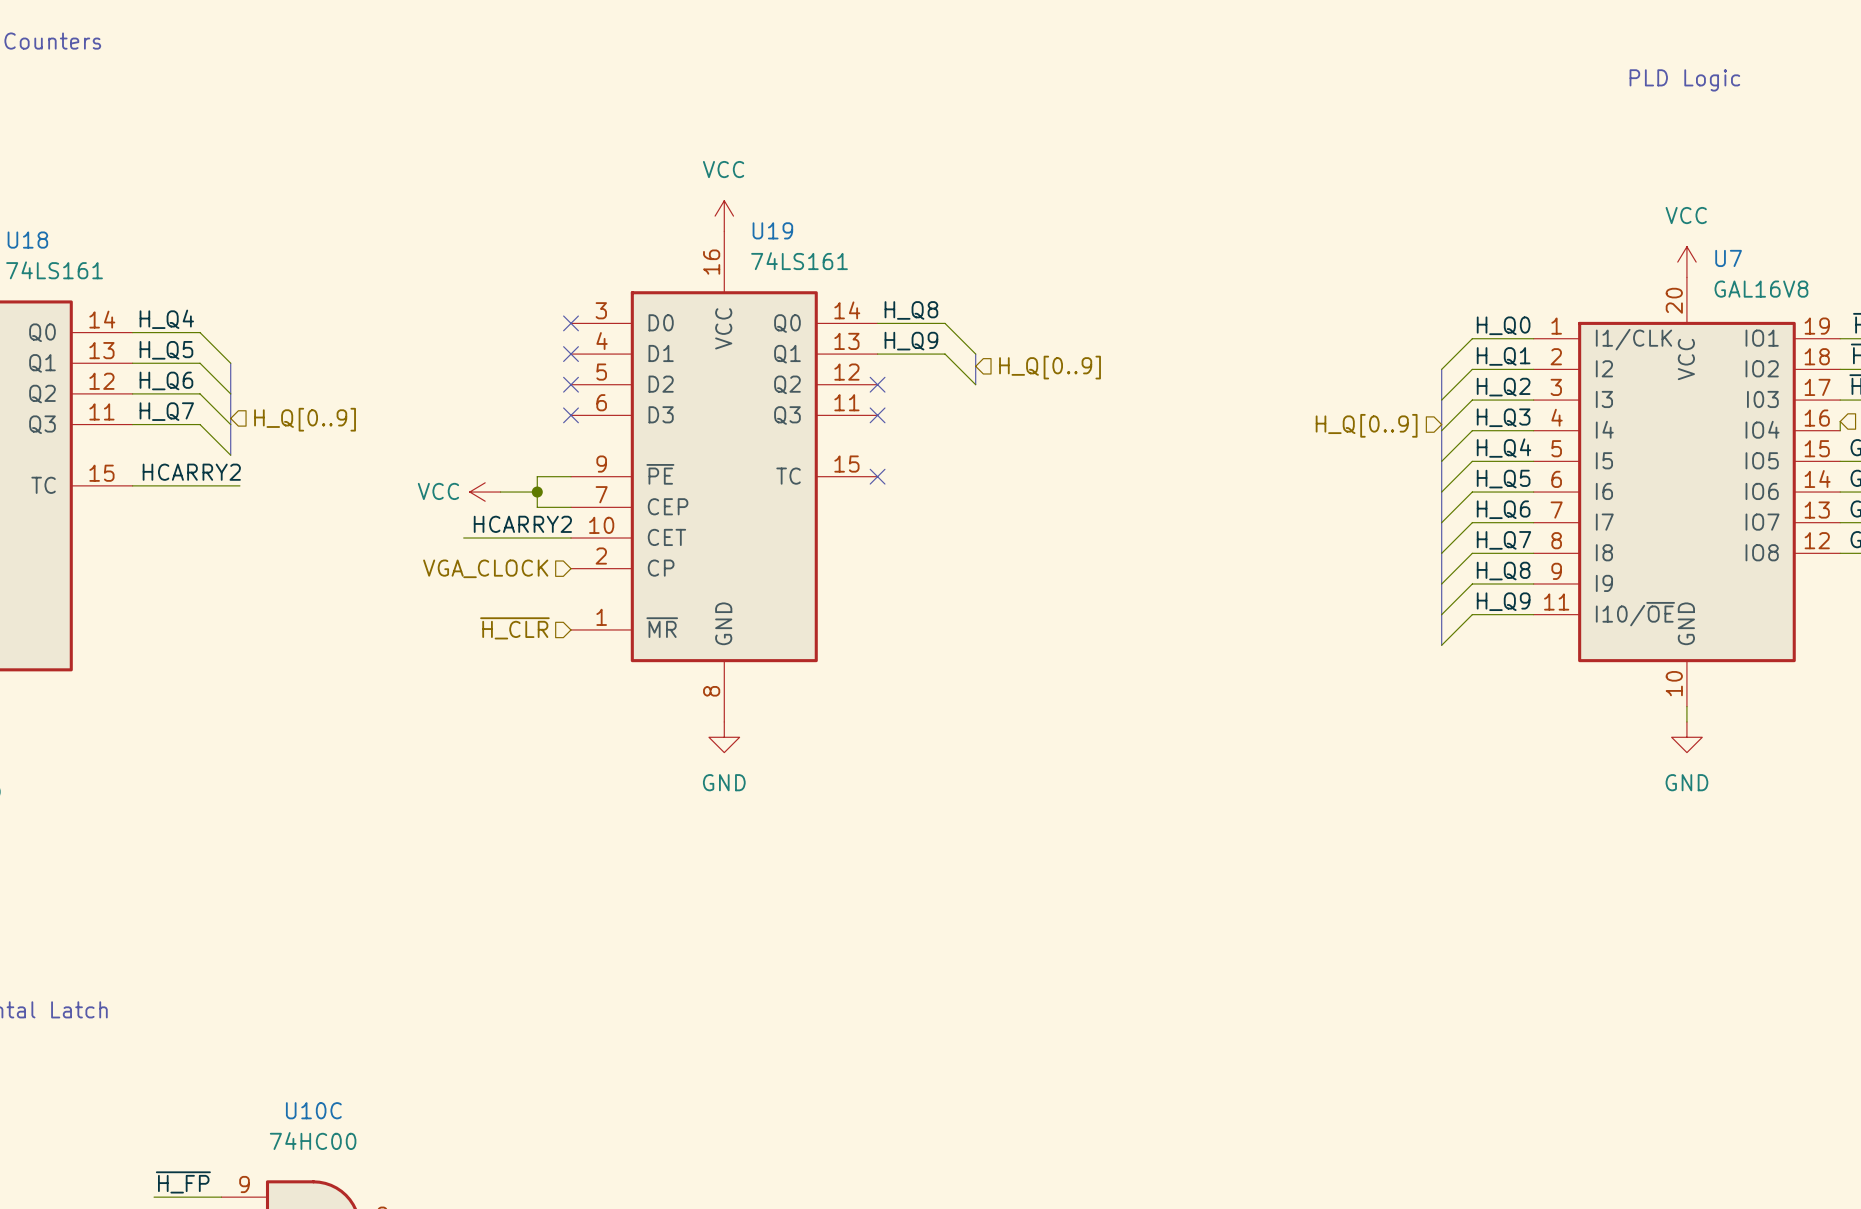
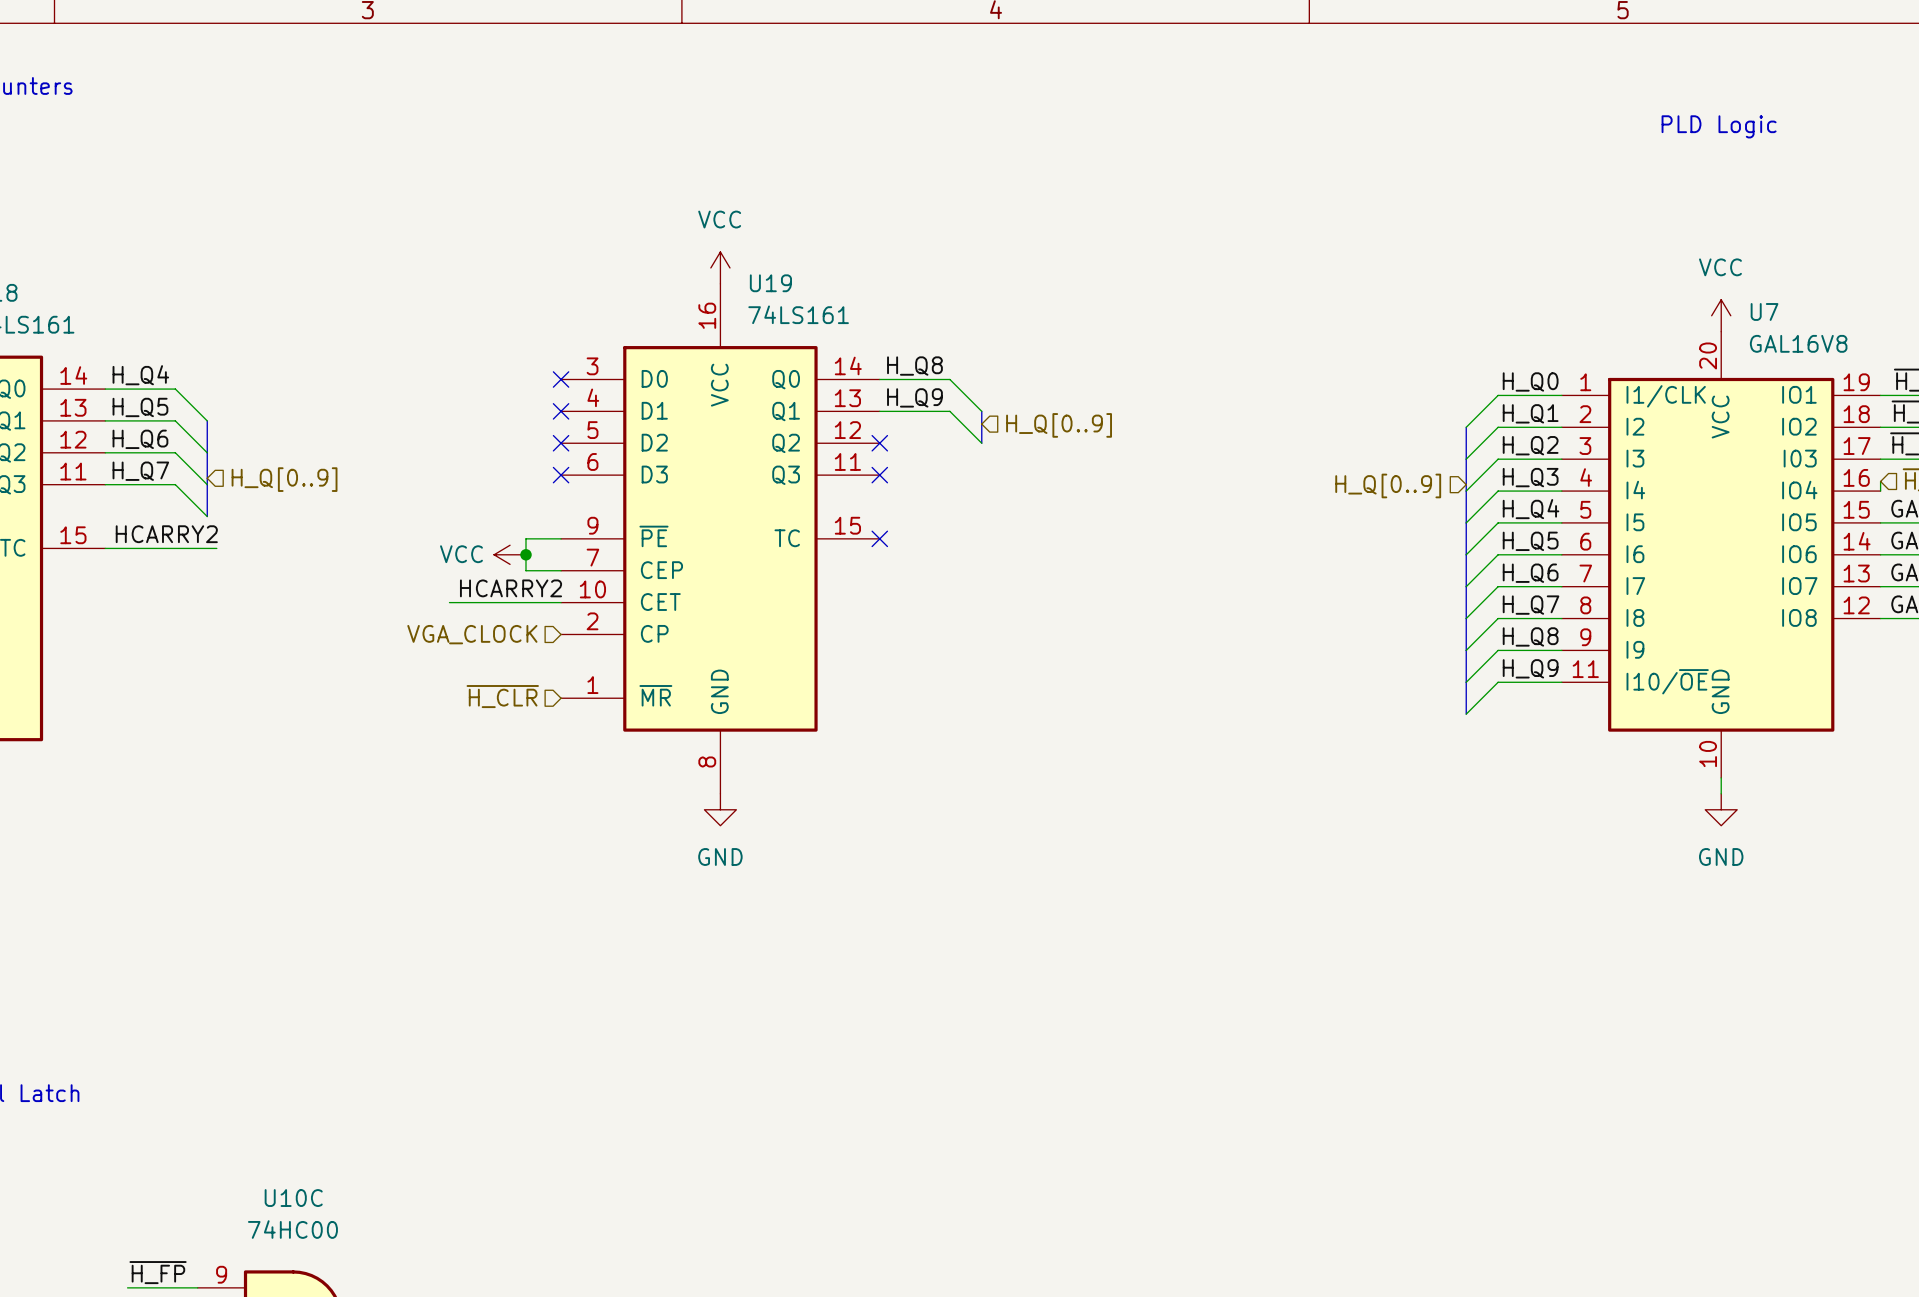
power symbol position: VCC (485, 492) -> VCC (510, 554)

